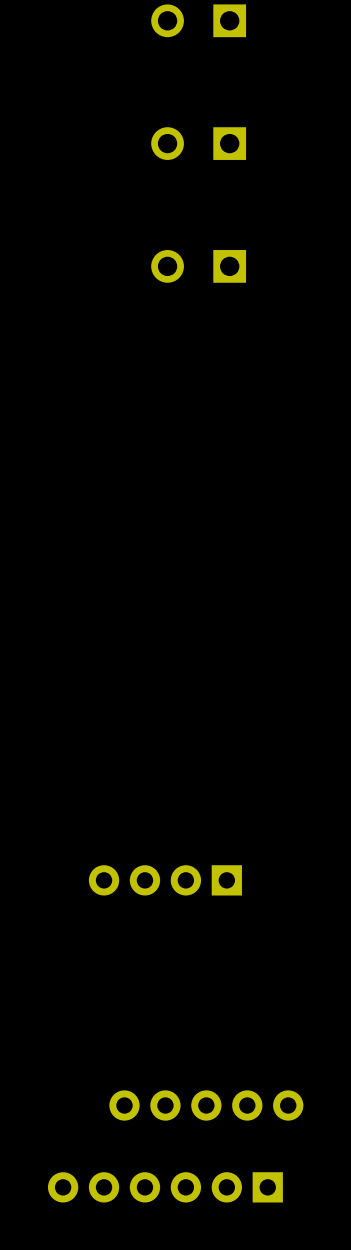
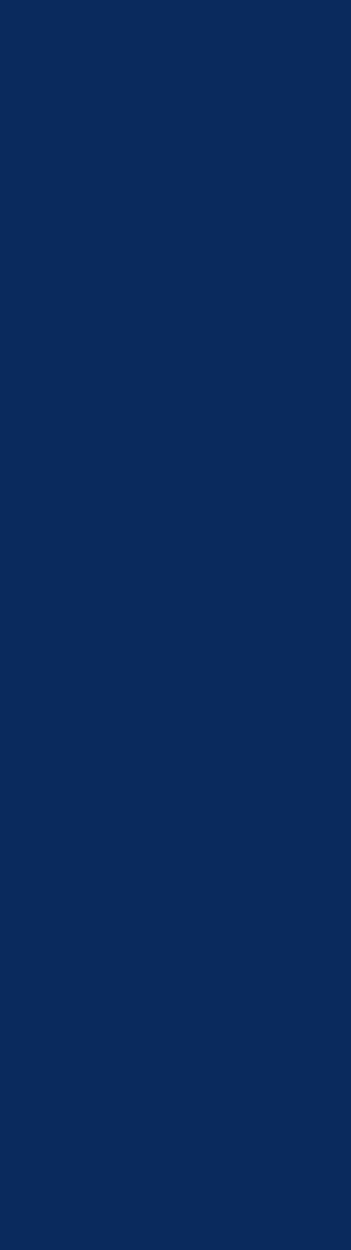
part: (198, 20) -> none
part: (198, 143) -> none
part: (198, 266) -> none
part: (165, 880) -> none
part: (206, 1105) -> none
part: (165, 1187) -> none

